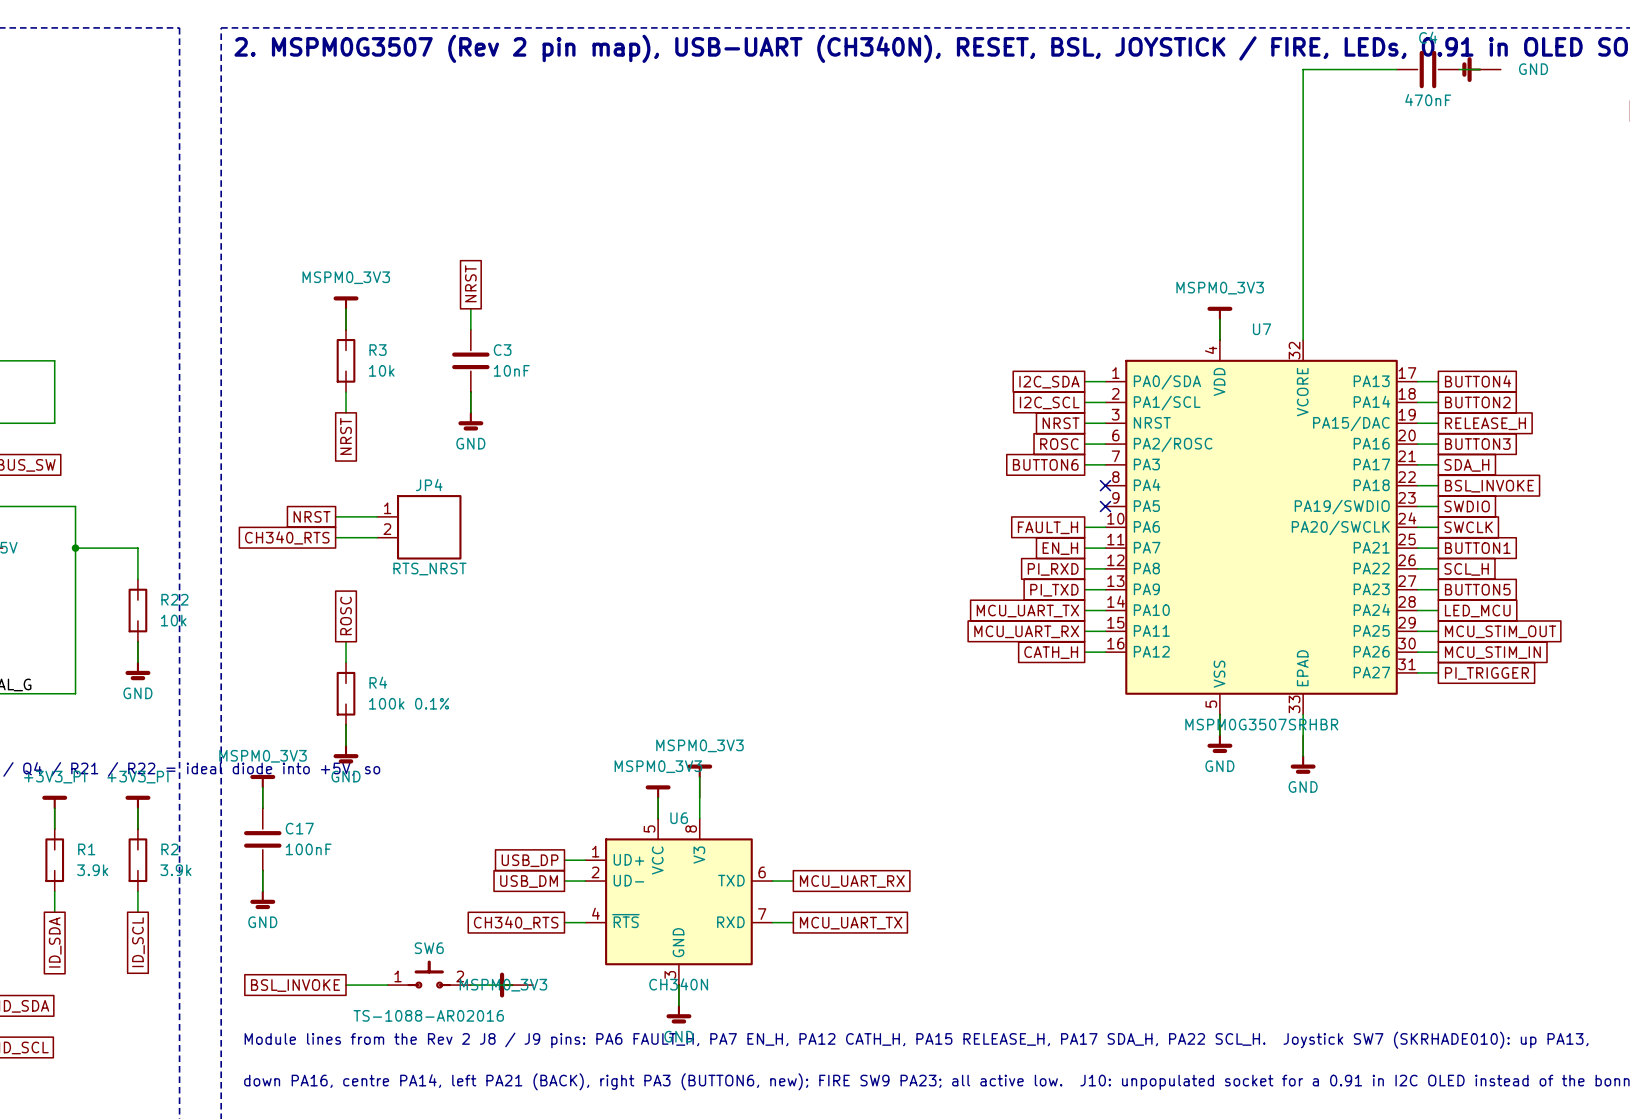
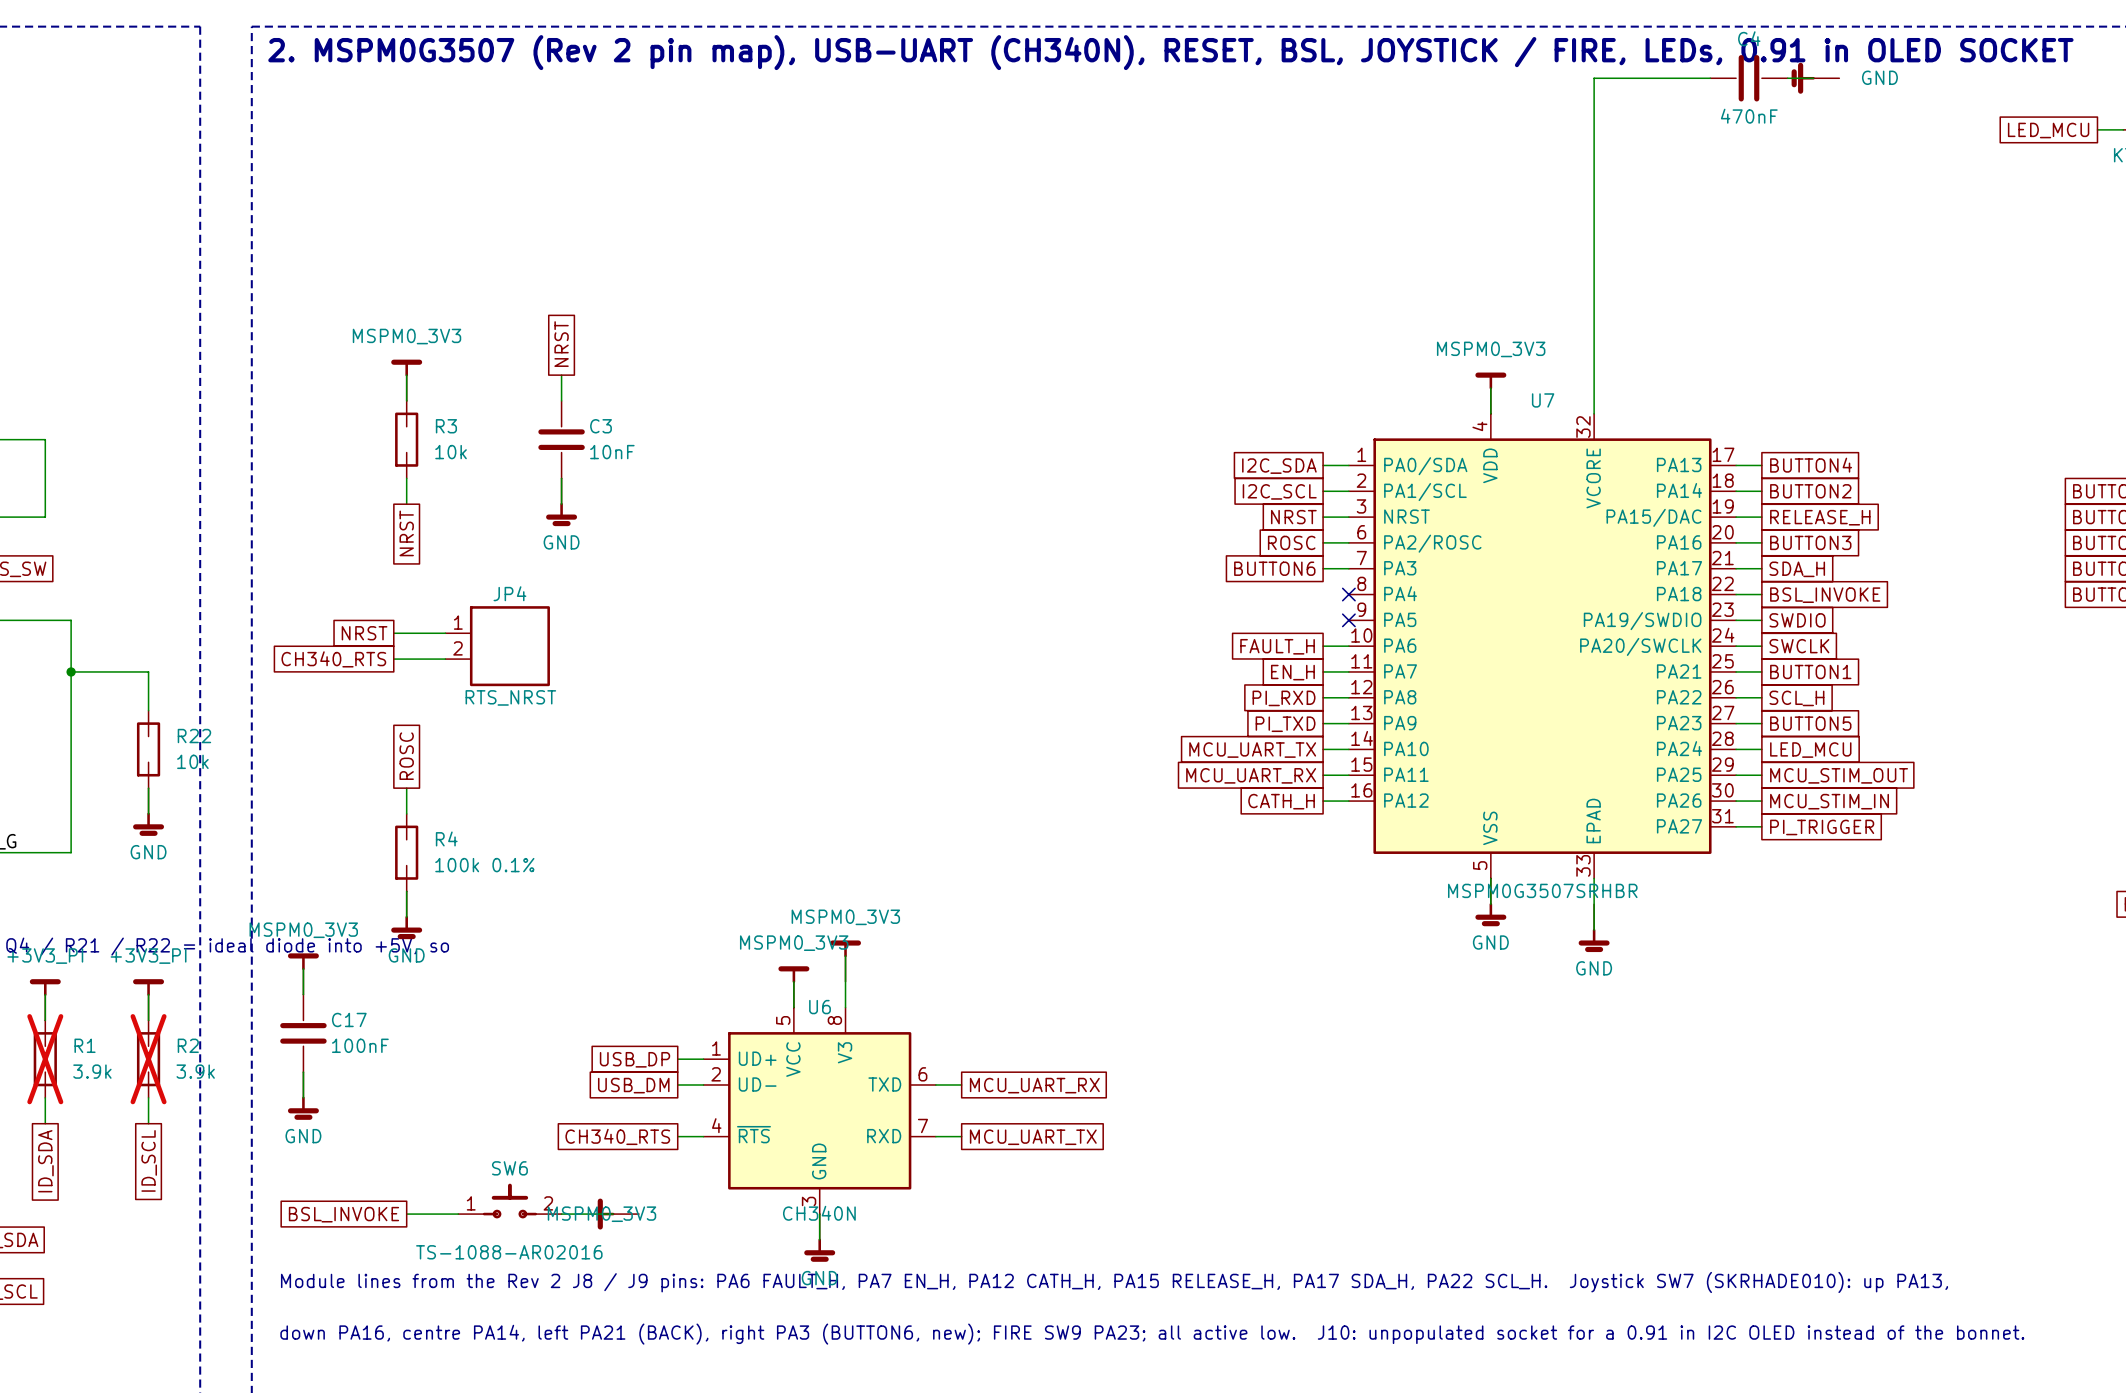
R1 do-not-place cross: none -> (45, 1059)
R2 do-not-place cross: none -> (148, 1059)

